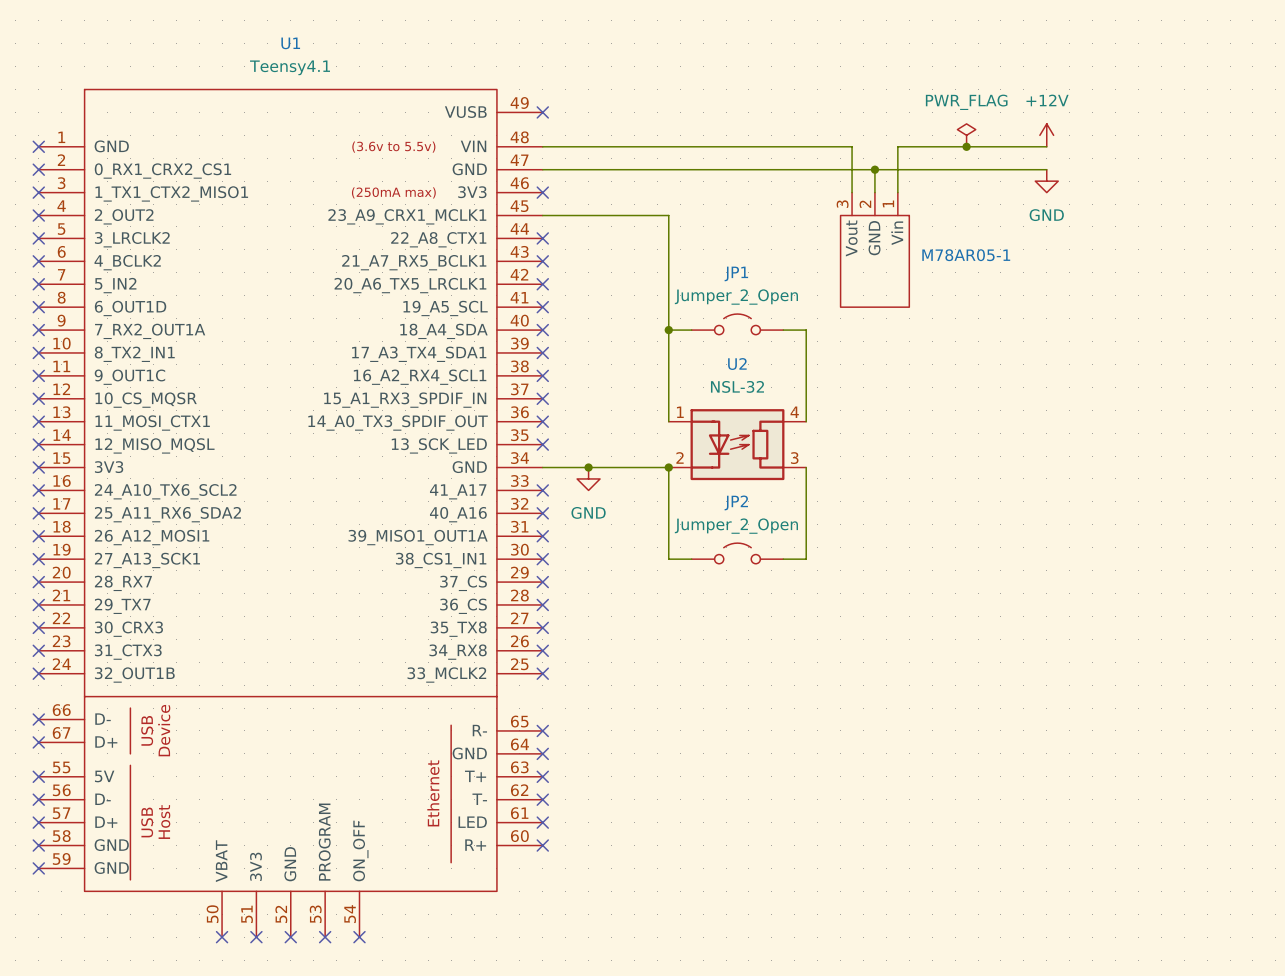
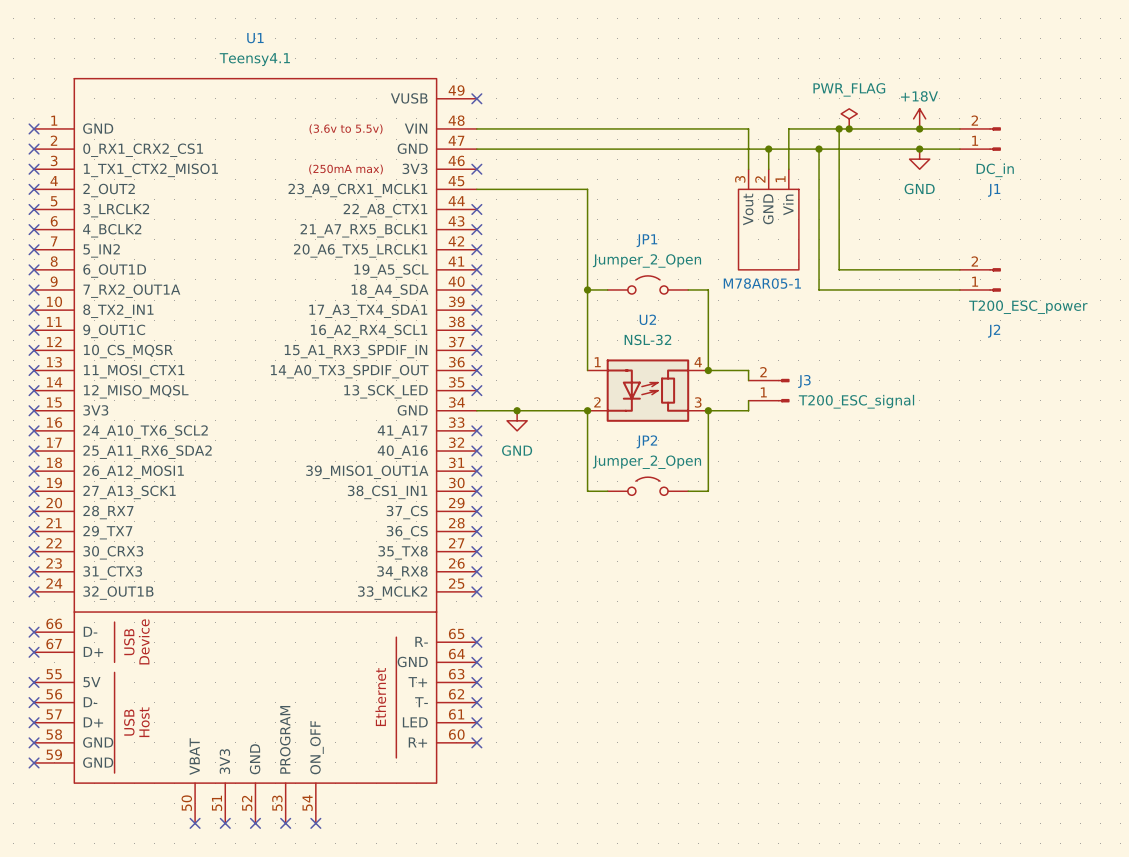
power symbol: +12V (1046, 135) -> +18V (919, 118)
wire: none -> (839, 128) (839, 269) (959, 269)
junction: none -> (839, 128)
wire: none -> (919, 128) (959, 128)
junction: none -> (919, 128)
J1: none -> DC_in (980, 139)
wire: none -> (819, 149) (819, 289) (959, 289)
junction: none -> (819, 149)
wire: none -> (919, 149) (959, 149)
junction: none -> (919, 149)
M78AR05-1 name position: M78AR05-1 (966, 255) -> M78AR05-1 (762, 283)
J2: none -> T200_ESC_power (980, 279)
wire: none -> (708, 370) (748, 370) (748, 380)
junction: none -> (708, 370)
J3: none -> T200_ESC_signal (769, 390)
wire: none -> (748, 400) (748, 410) (708, 410)
junction: none -> (708, 410)

